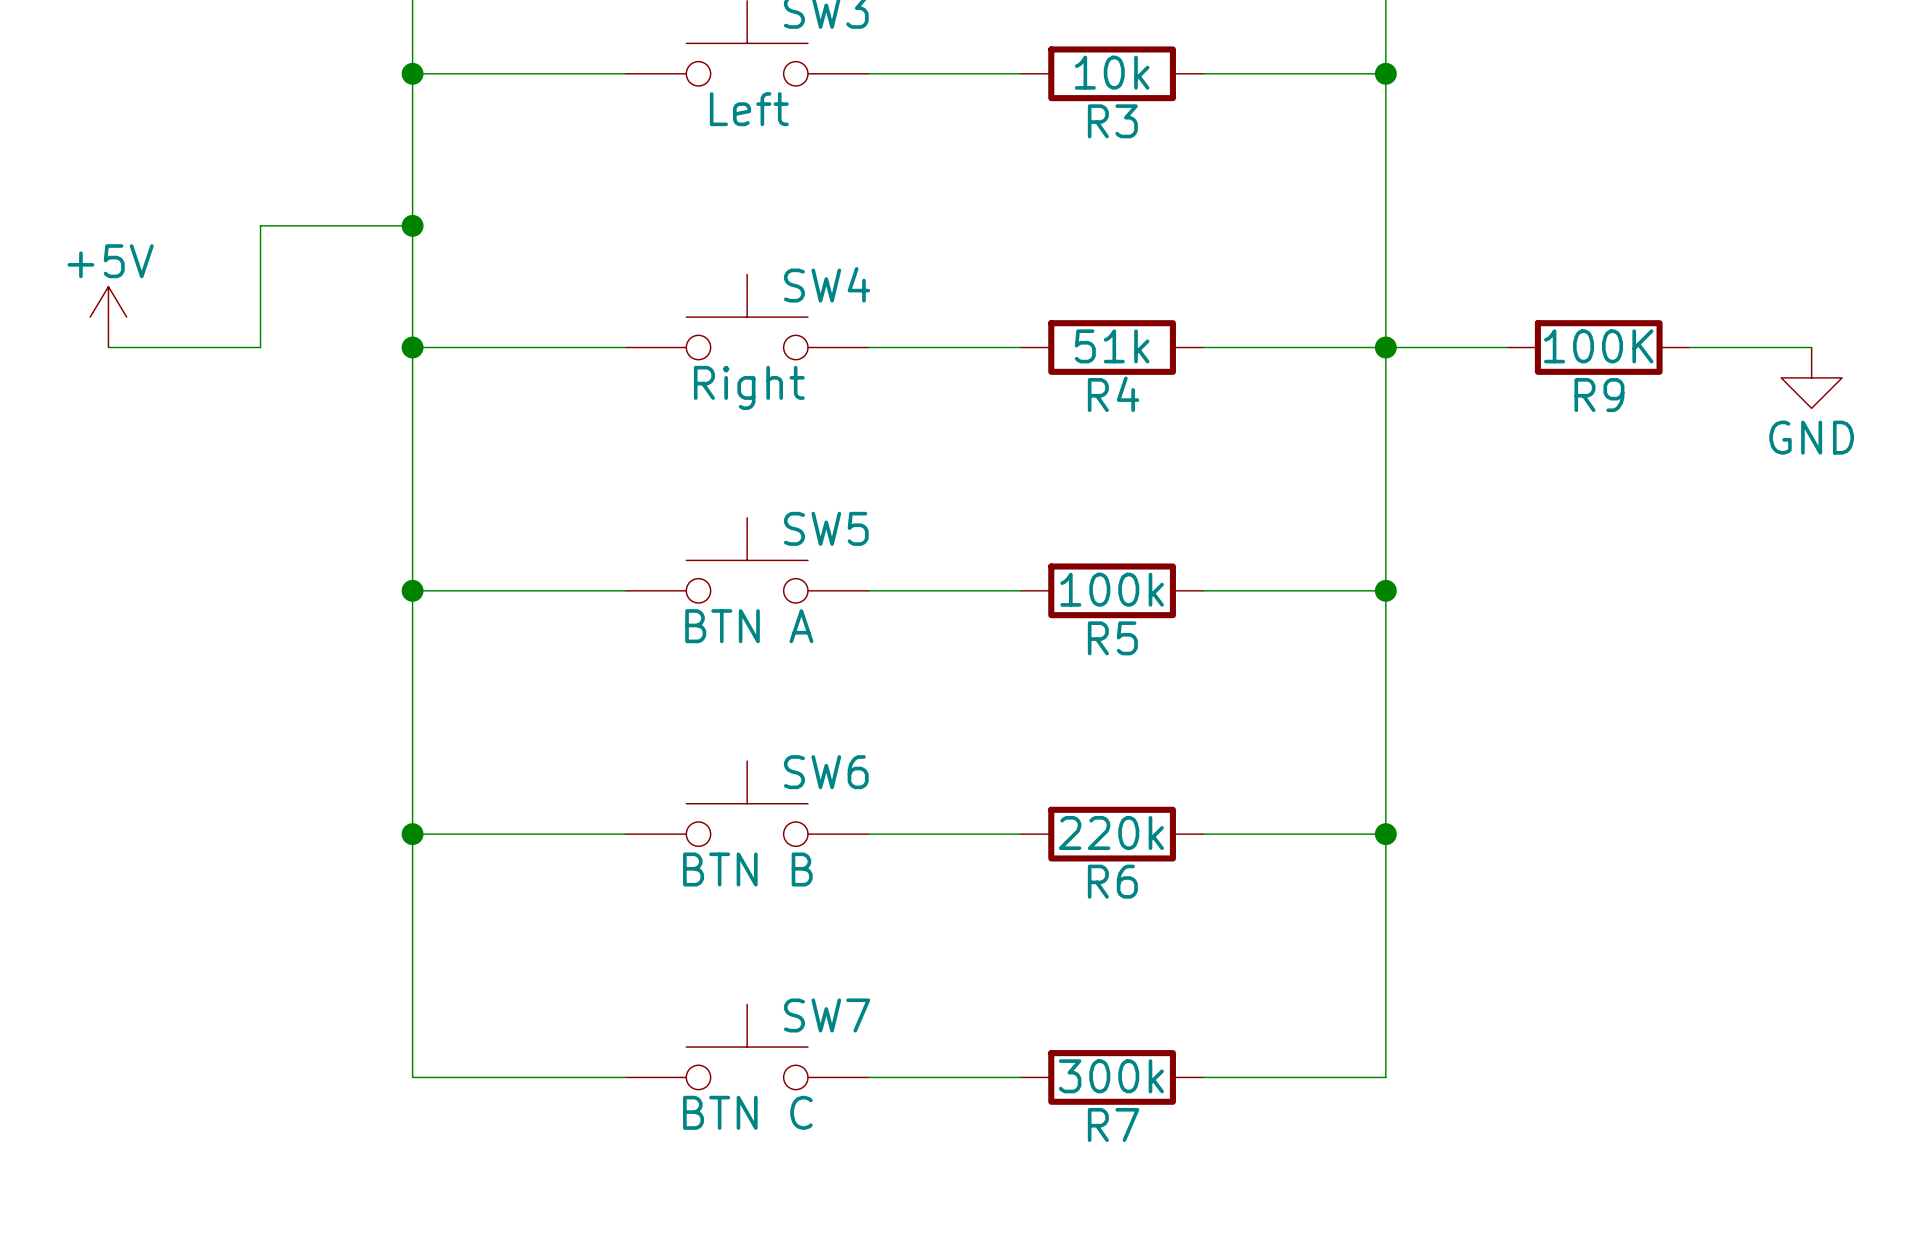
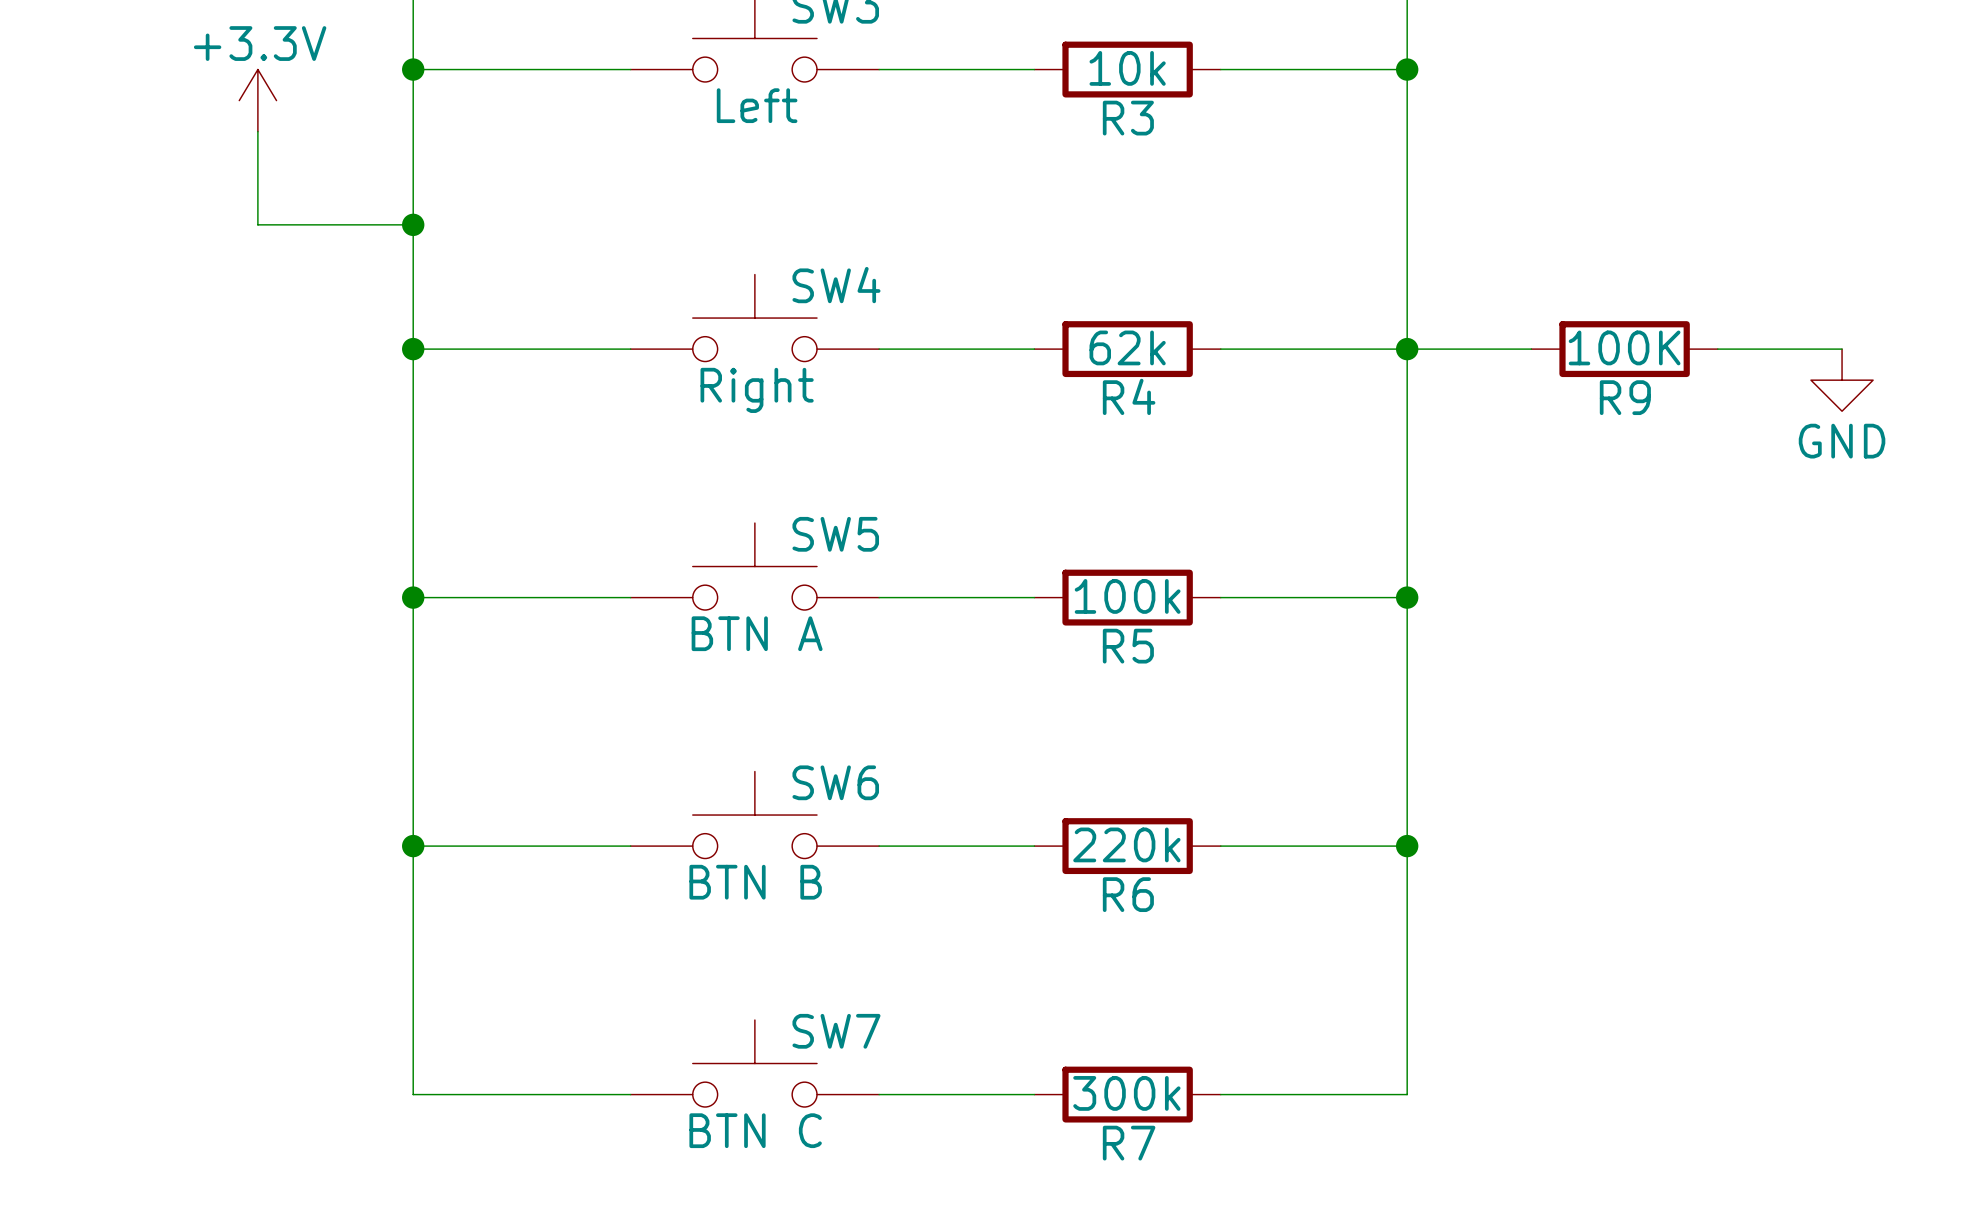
power symbol: none -> +3.3V (257, 100)
wire: (260, 225) (260, 347) (108, 347) -> (257, 224) (257, 131)
power symbol: +5V (108, 317) -> none
R4 value: 51k (1112, 346) -> 62k (1127, 347)

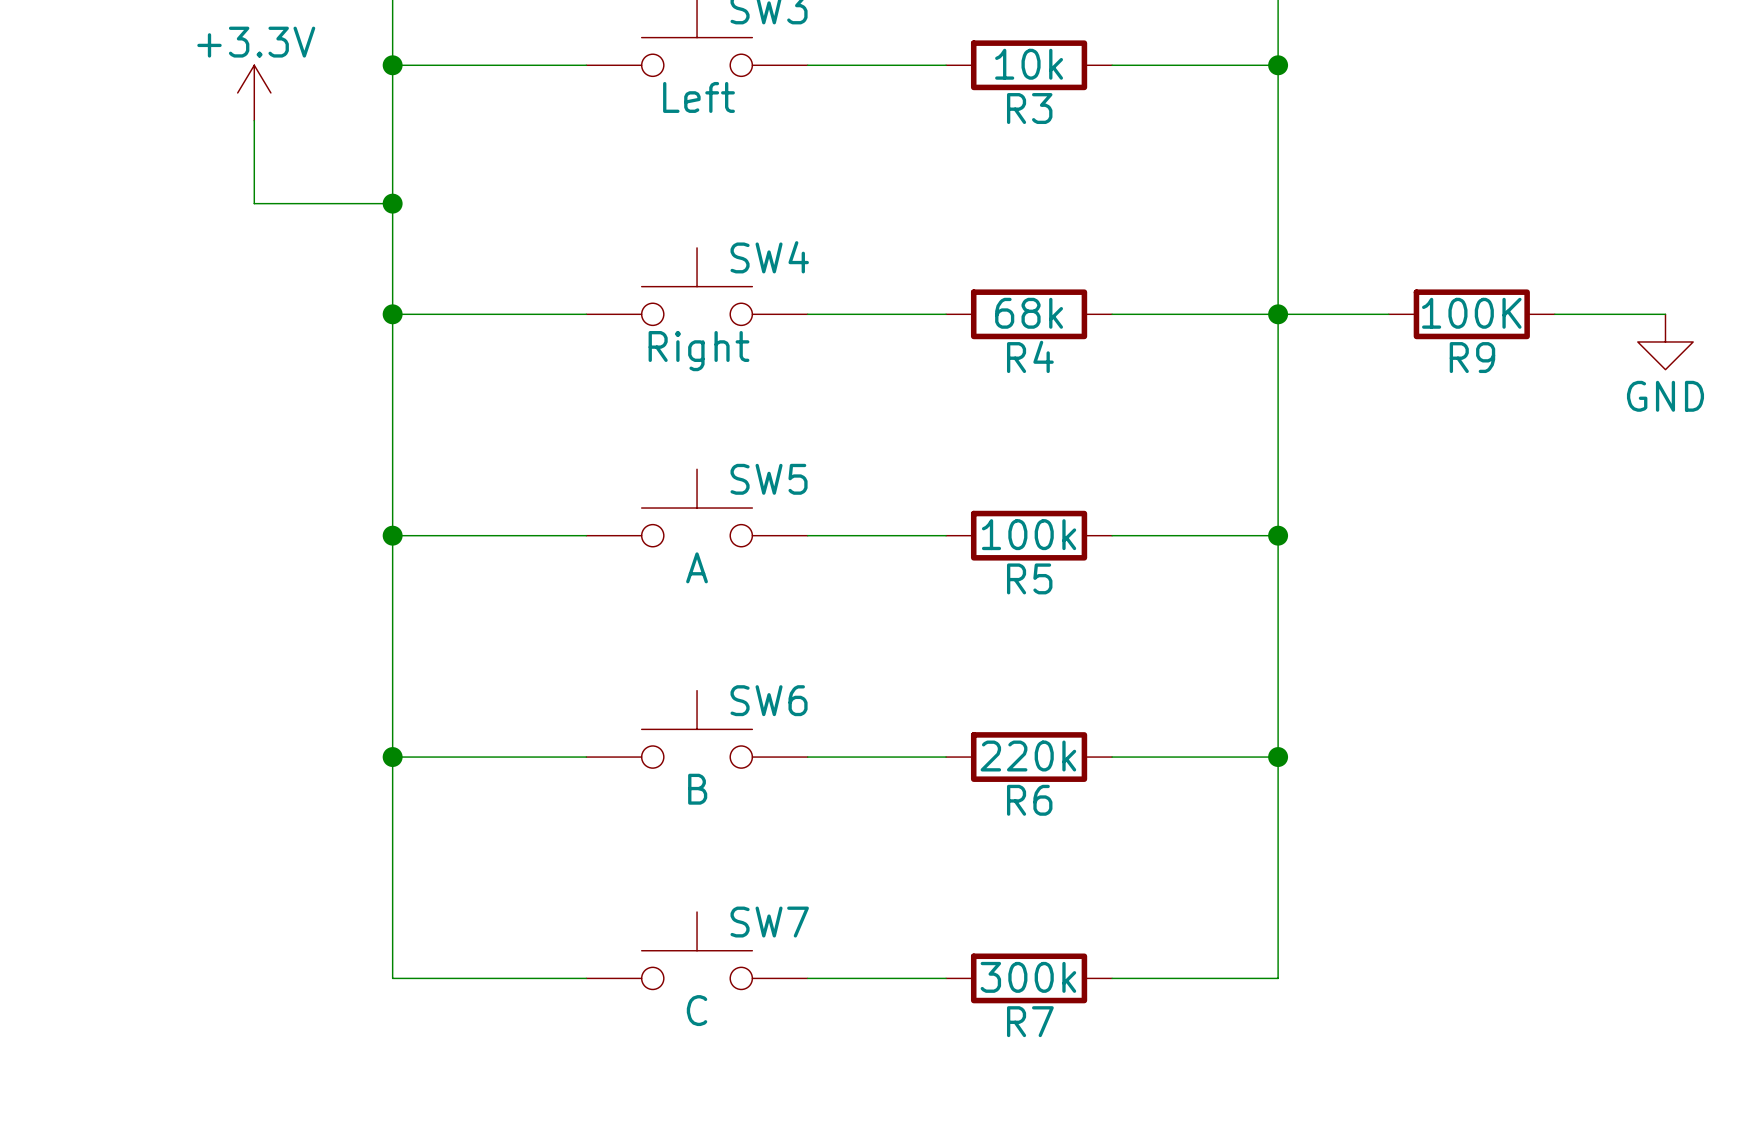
R4 value: 62k (1127, 347) -> 68k (1029, 313)
SW5 value: BTN A (757, 633) -> A (697, 567)
SW6 value: BTN B (755, 882) -> B (697, 789)
SW7 value: BTN C (755, 1130) -> C (697, 1010)

